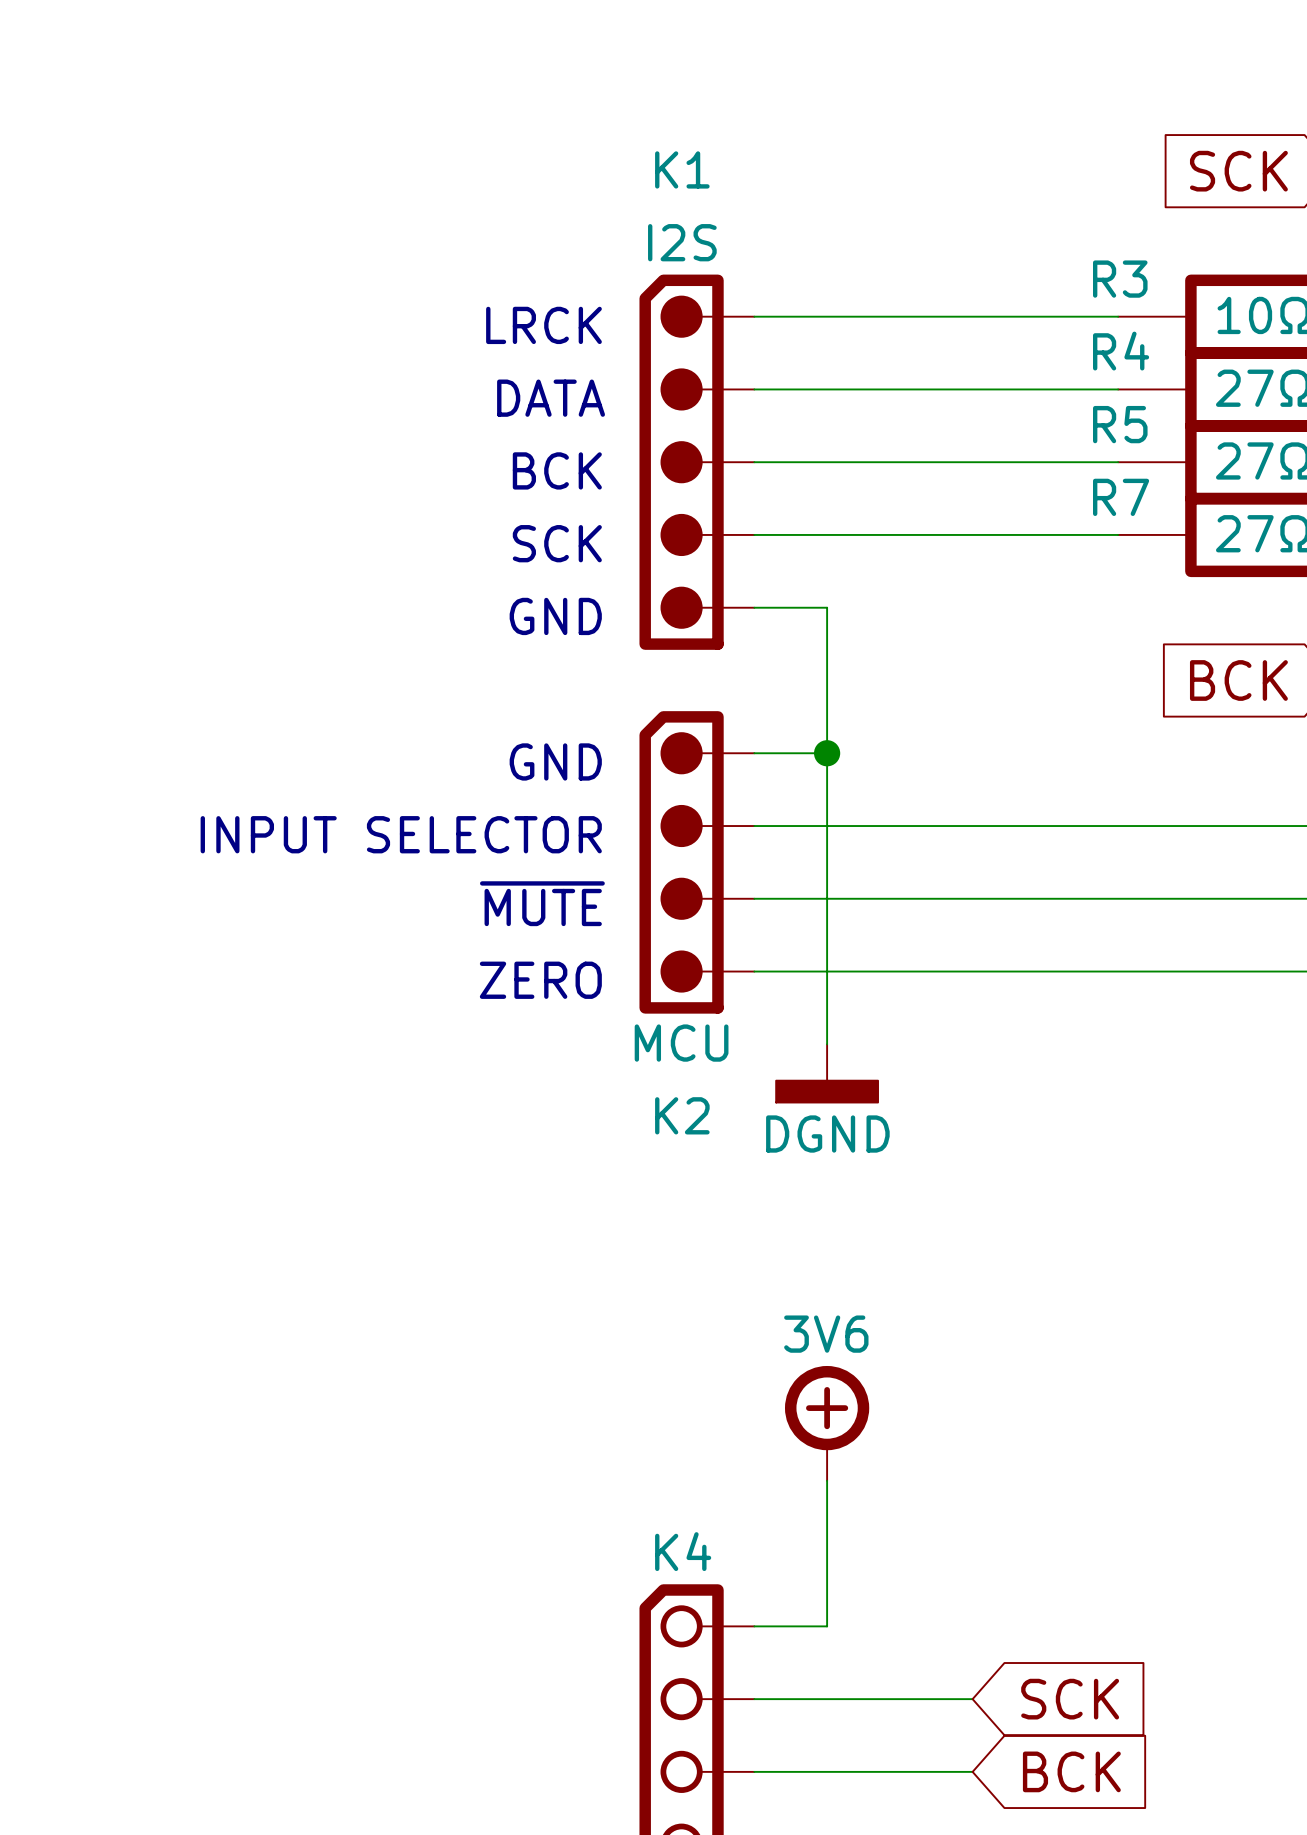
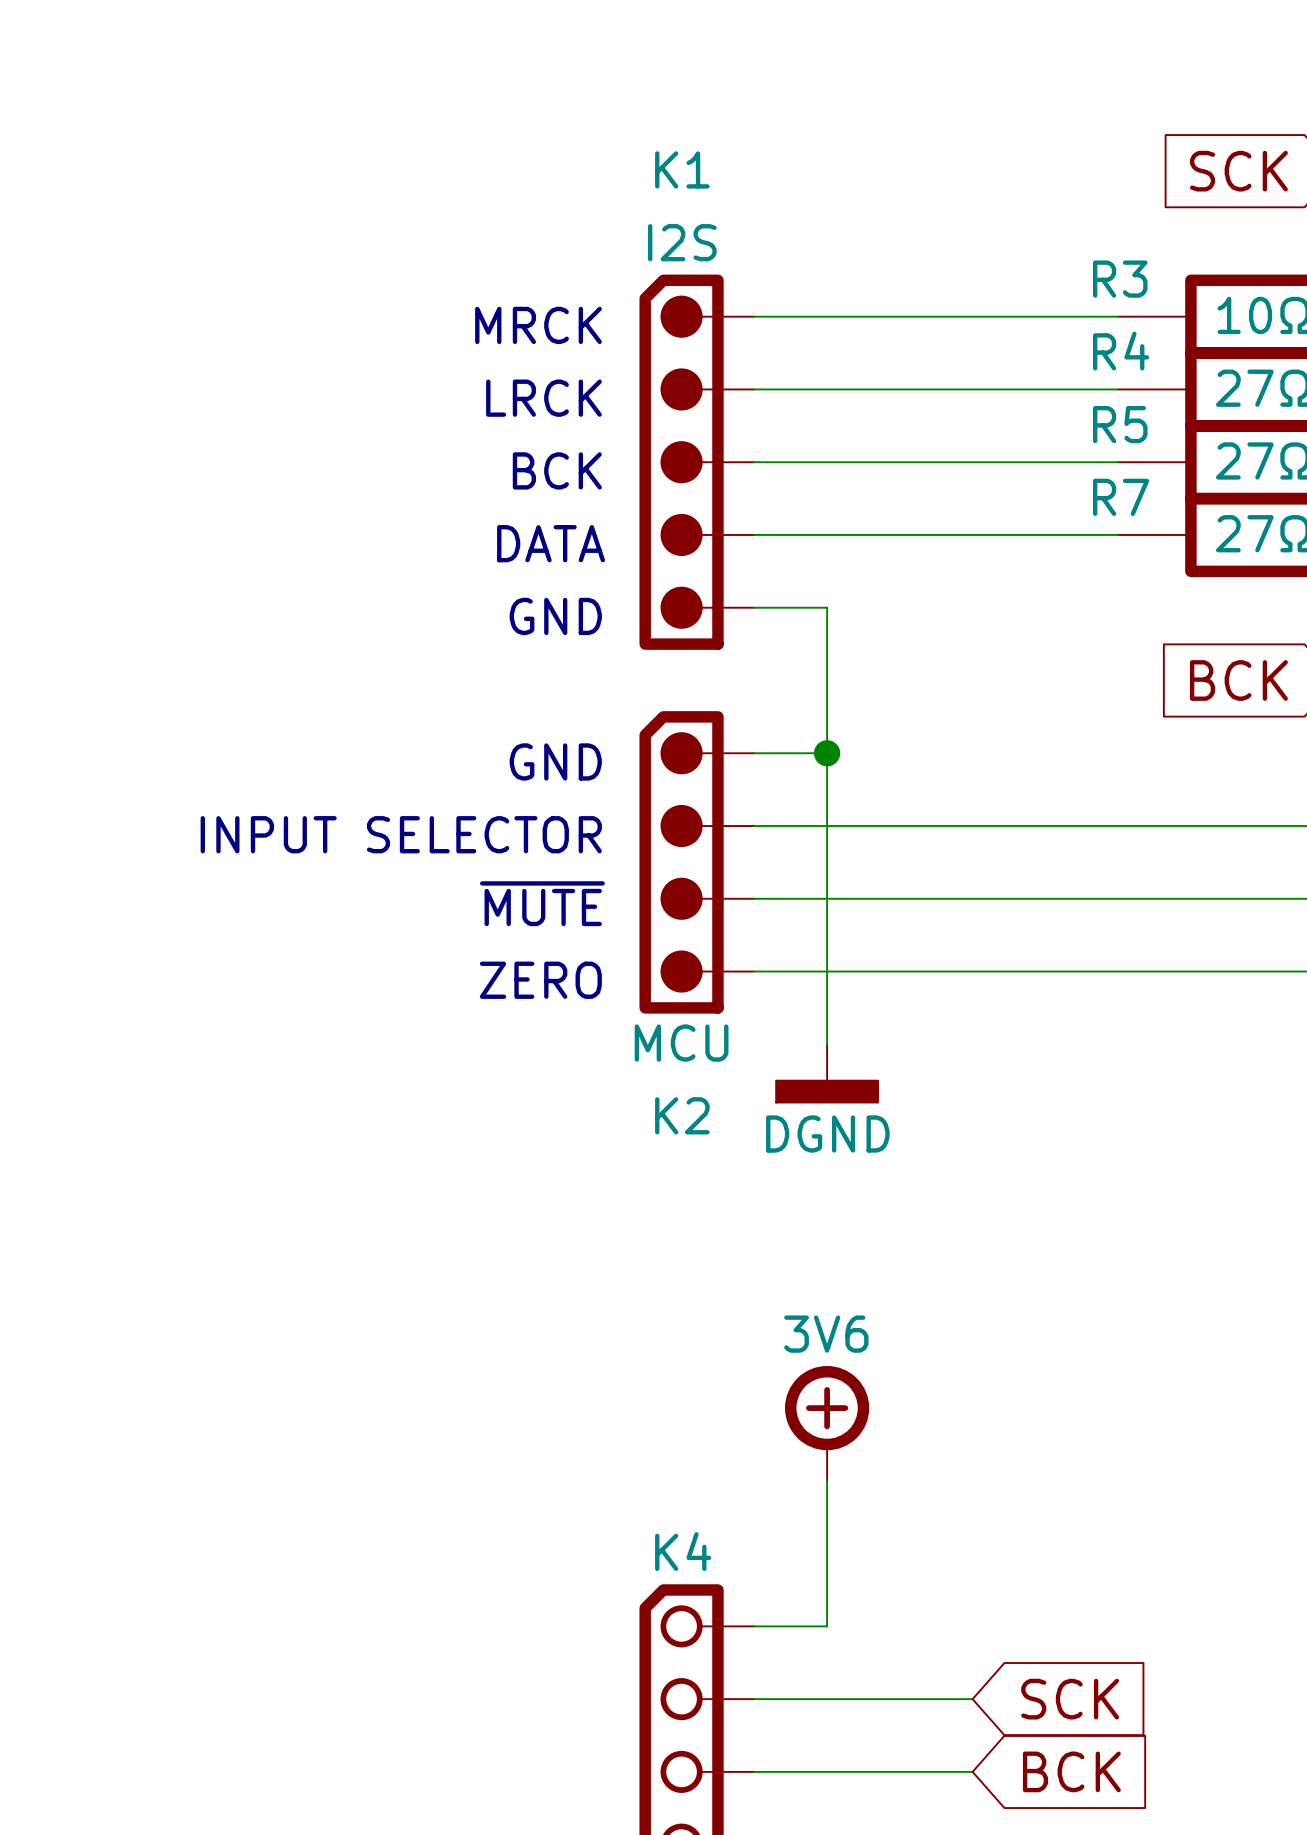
text: LRCK (543, 325) -> MRCK (538, 325)
text: DATA (551, 398) -> LRCK (543, 398)
text: SCK (557, 543) -> DATA (551, 543)

